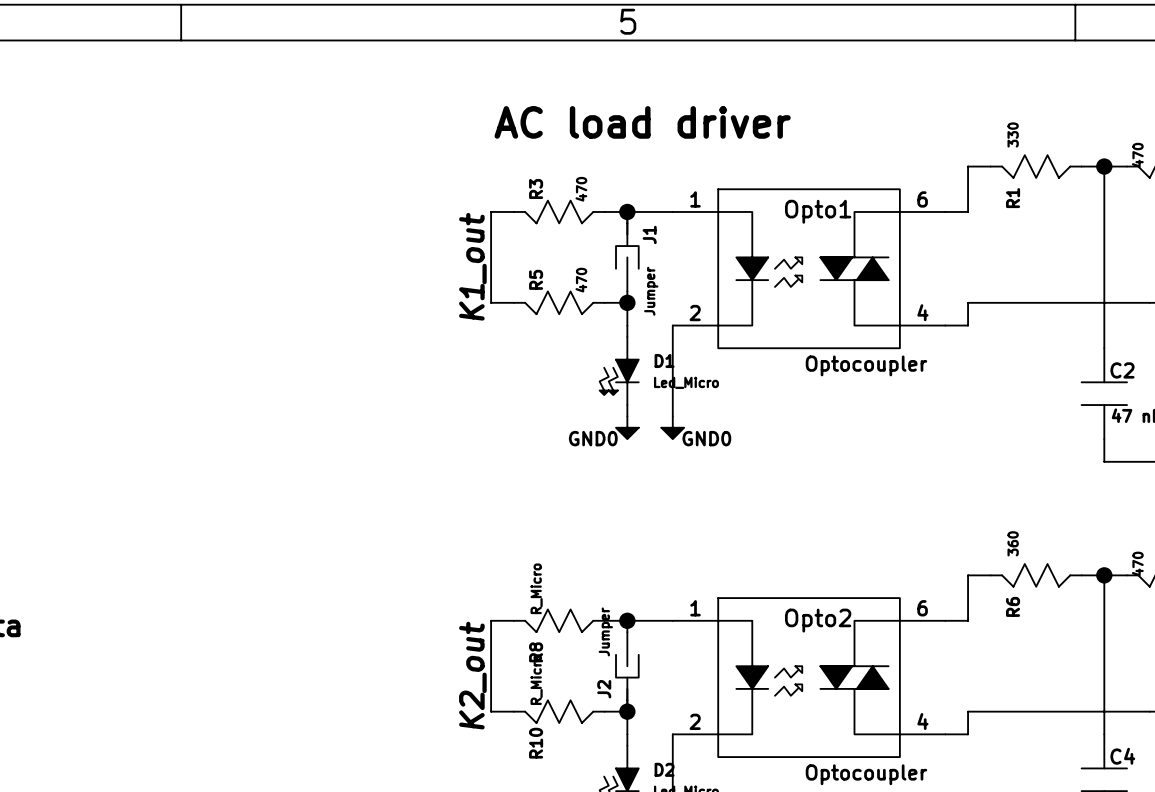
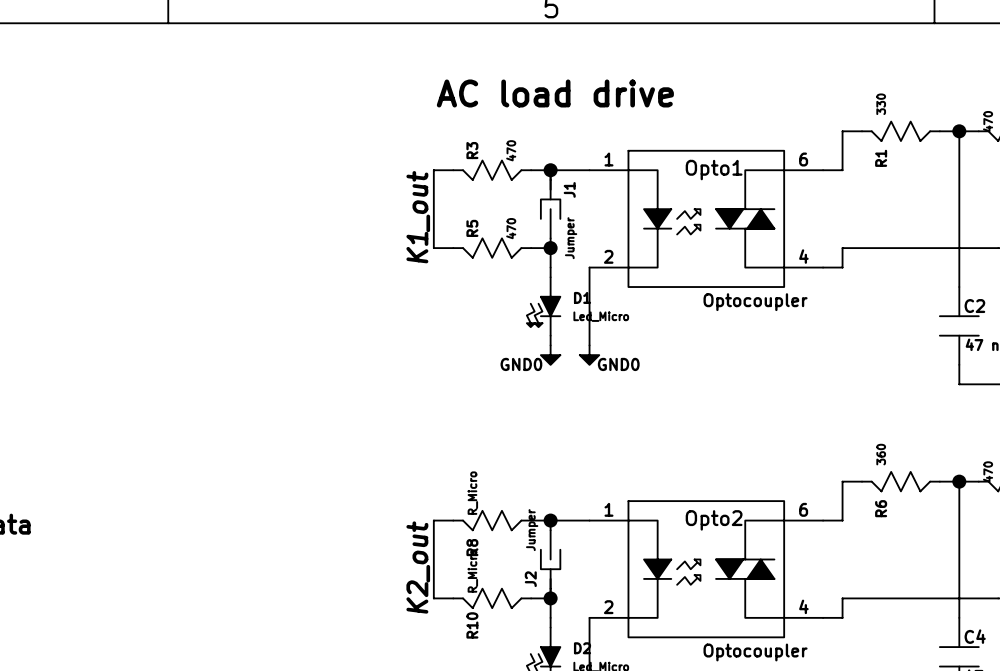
text: AC load driver (642, 122) -> AC load drive (555, 93)

